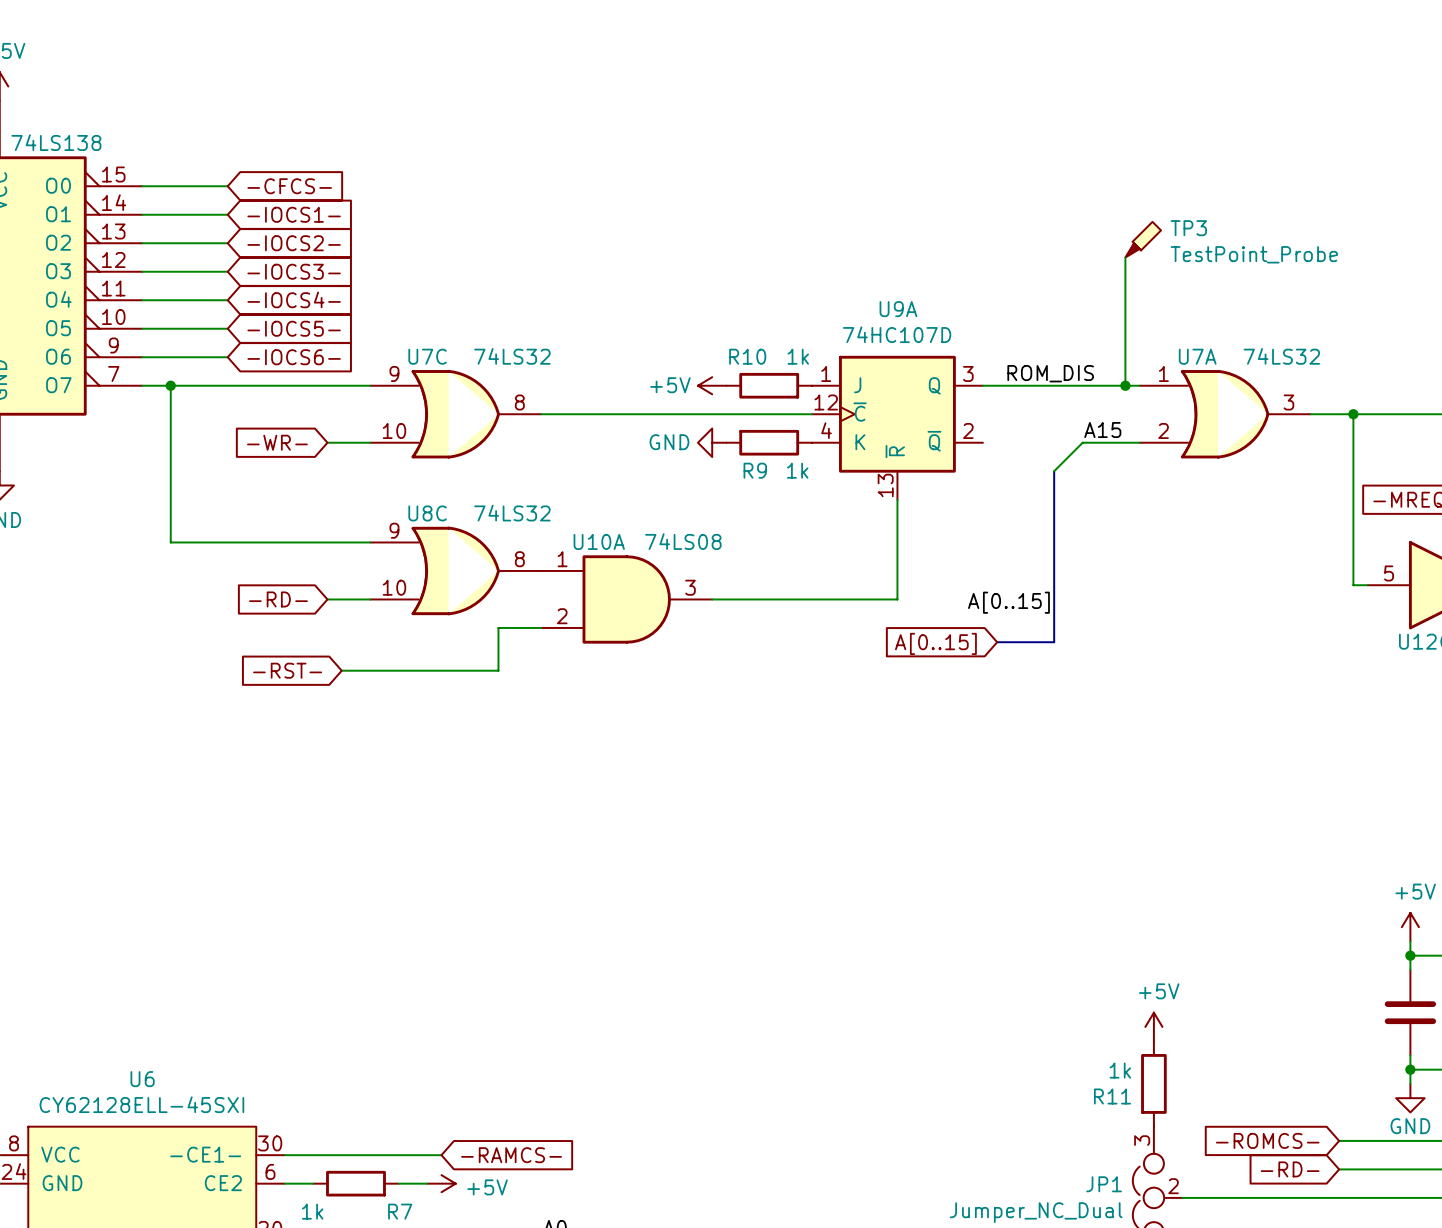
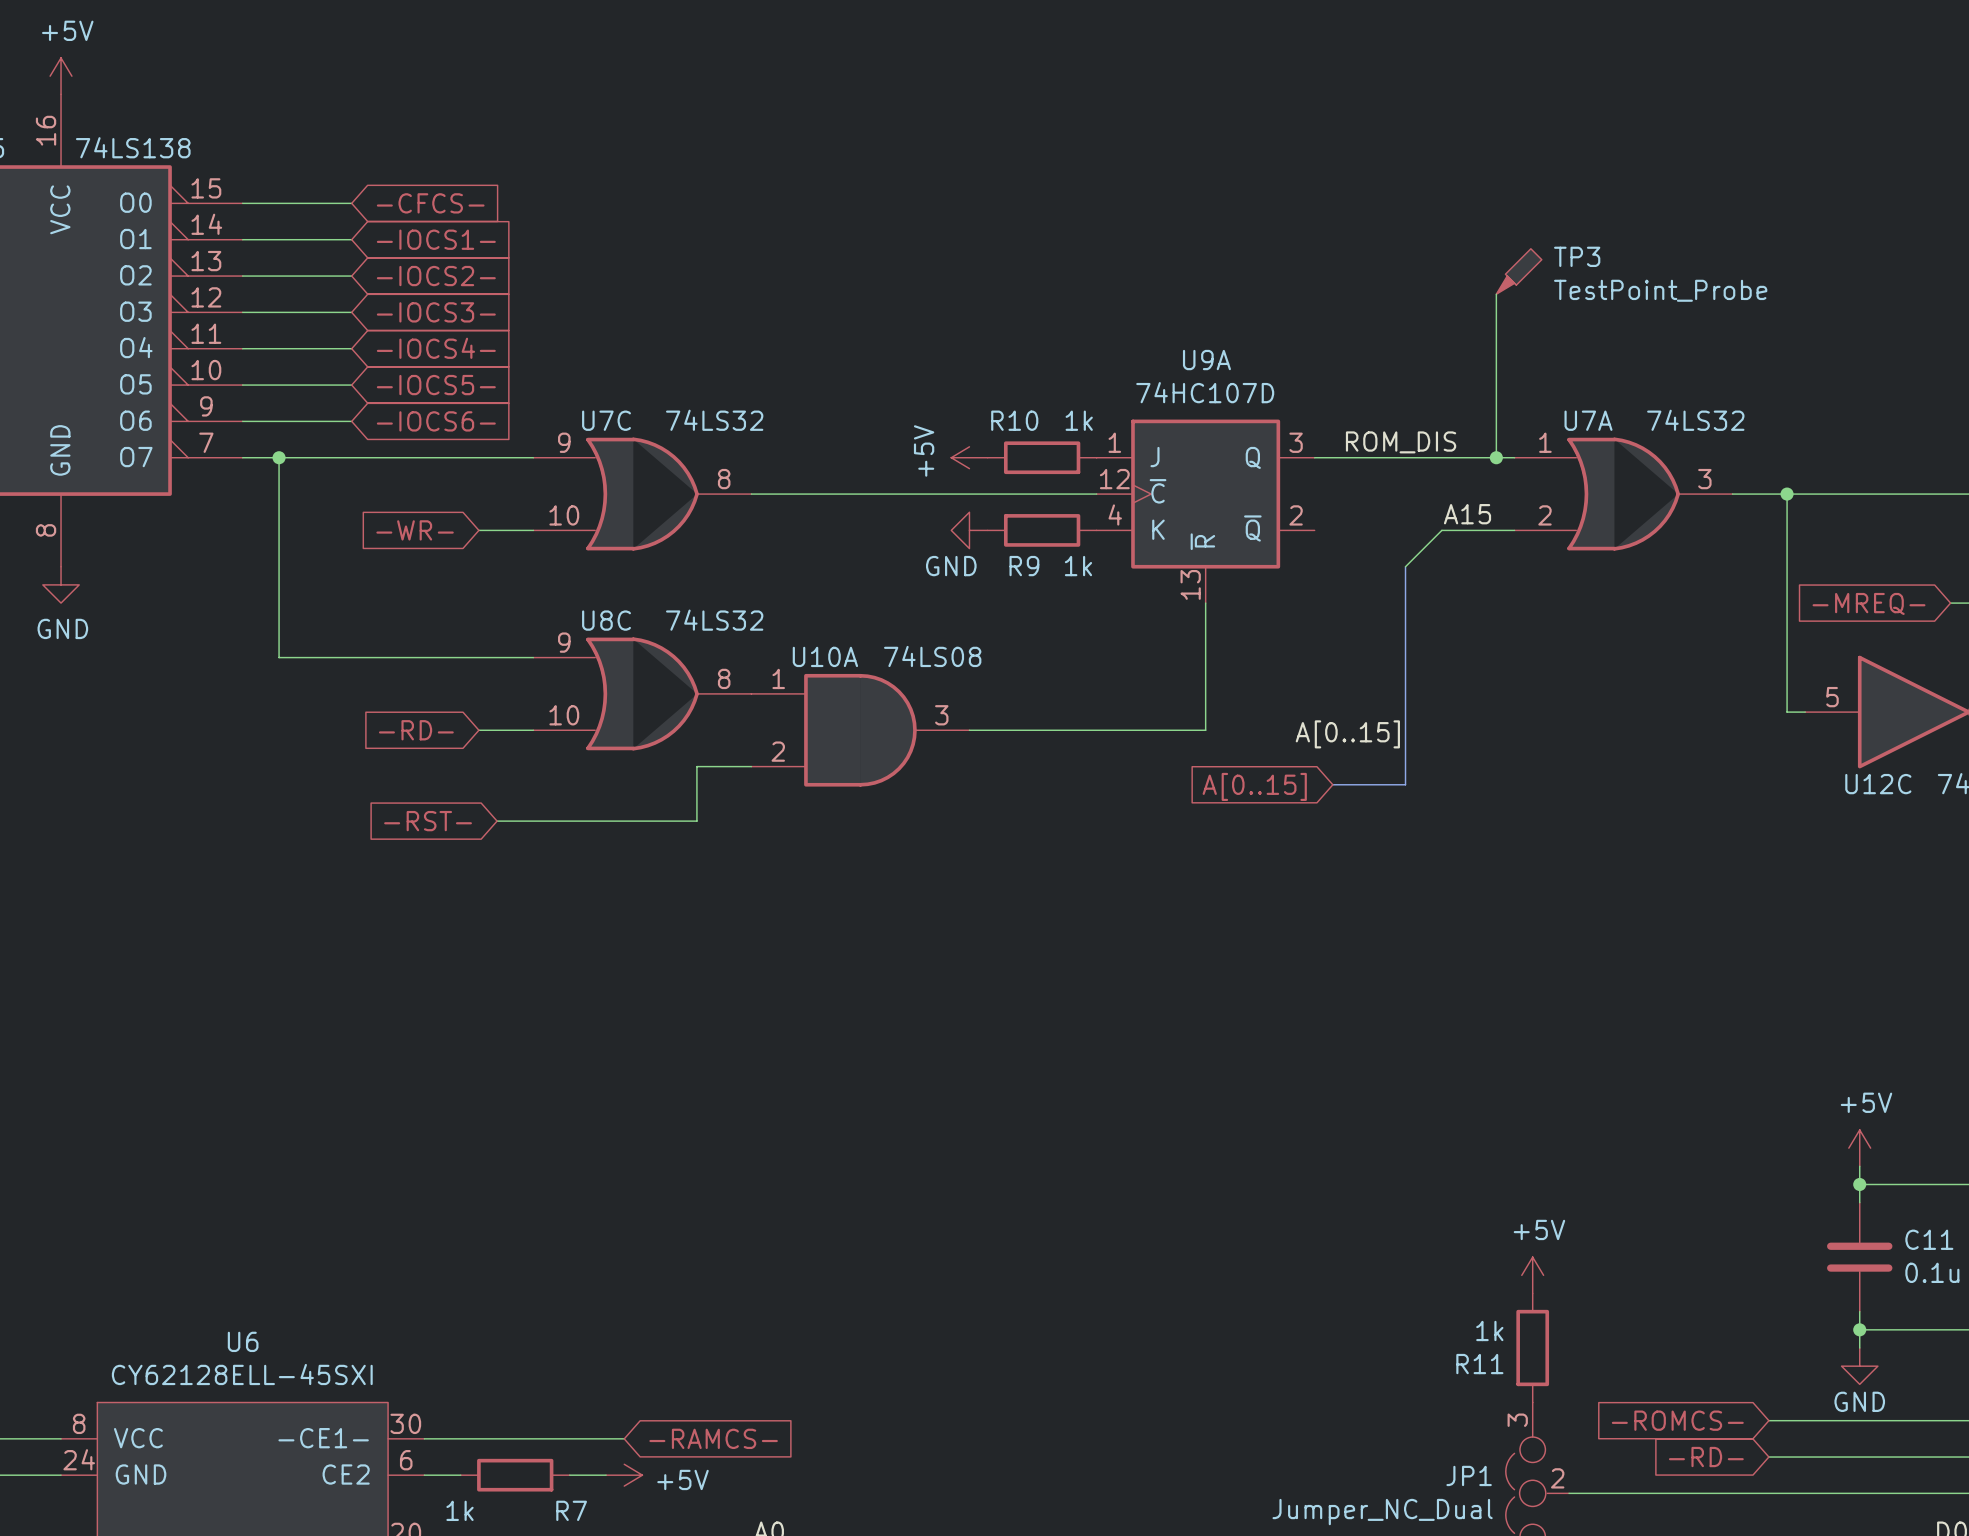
power symbol text rotation: 0° (670, 385) -> 90° counterclockwise (924, 450)
power symbol text position: GND (669, 442) -> GND (951, 566)

